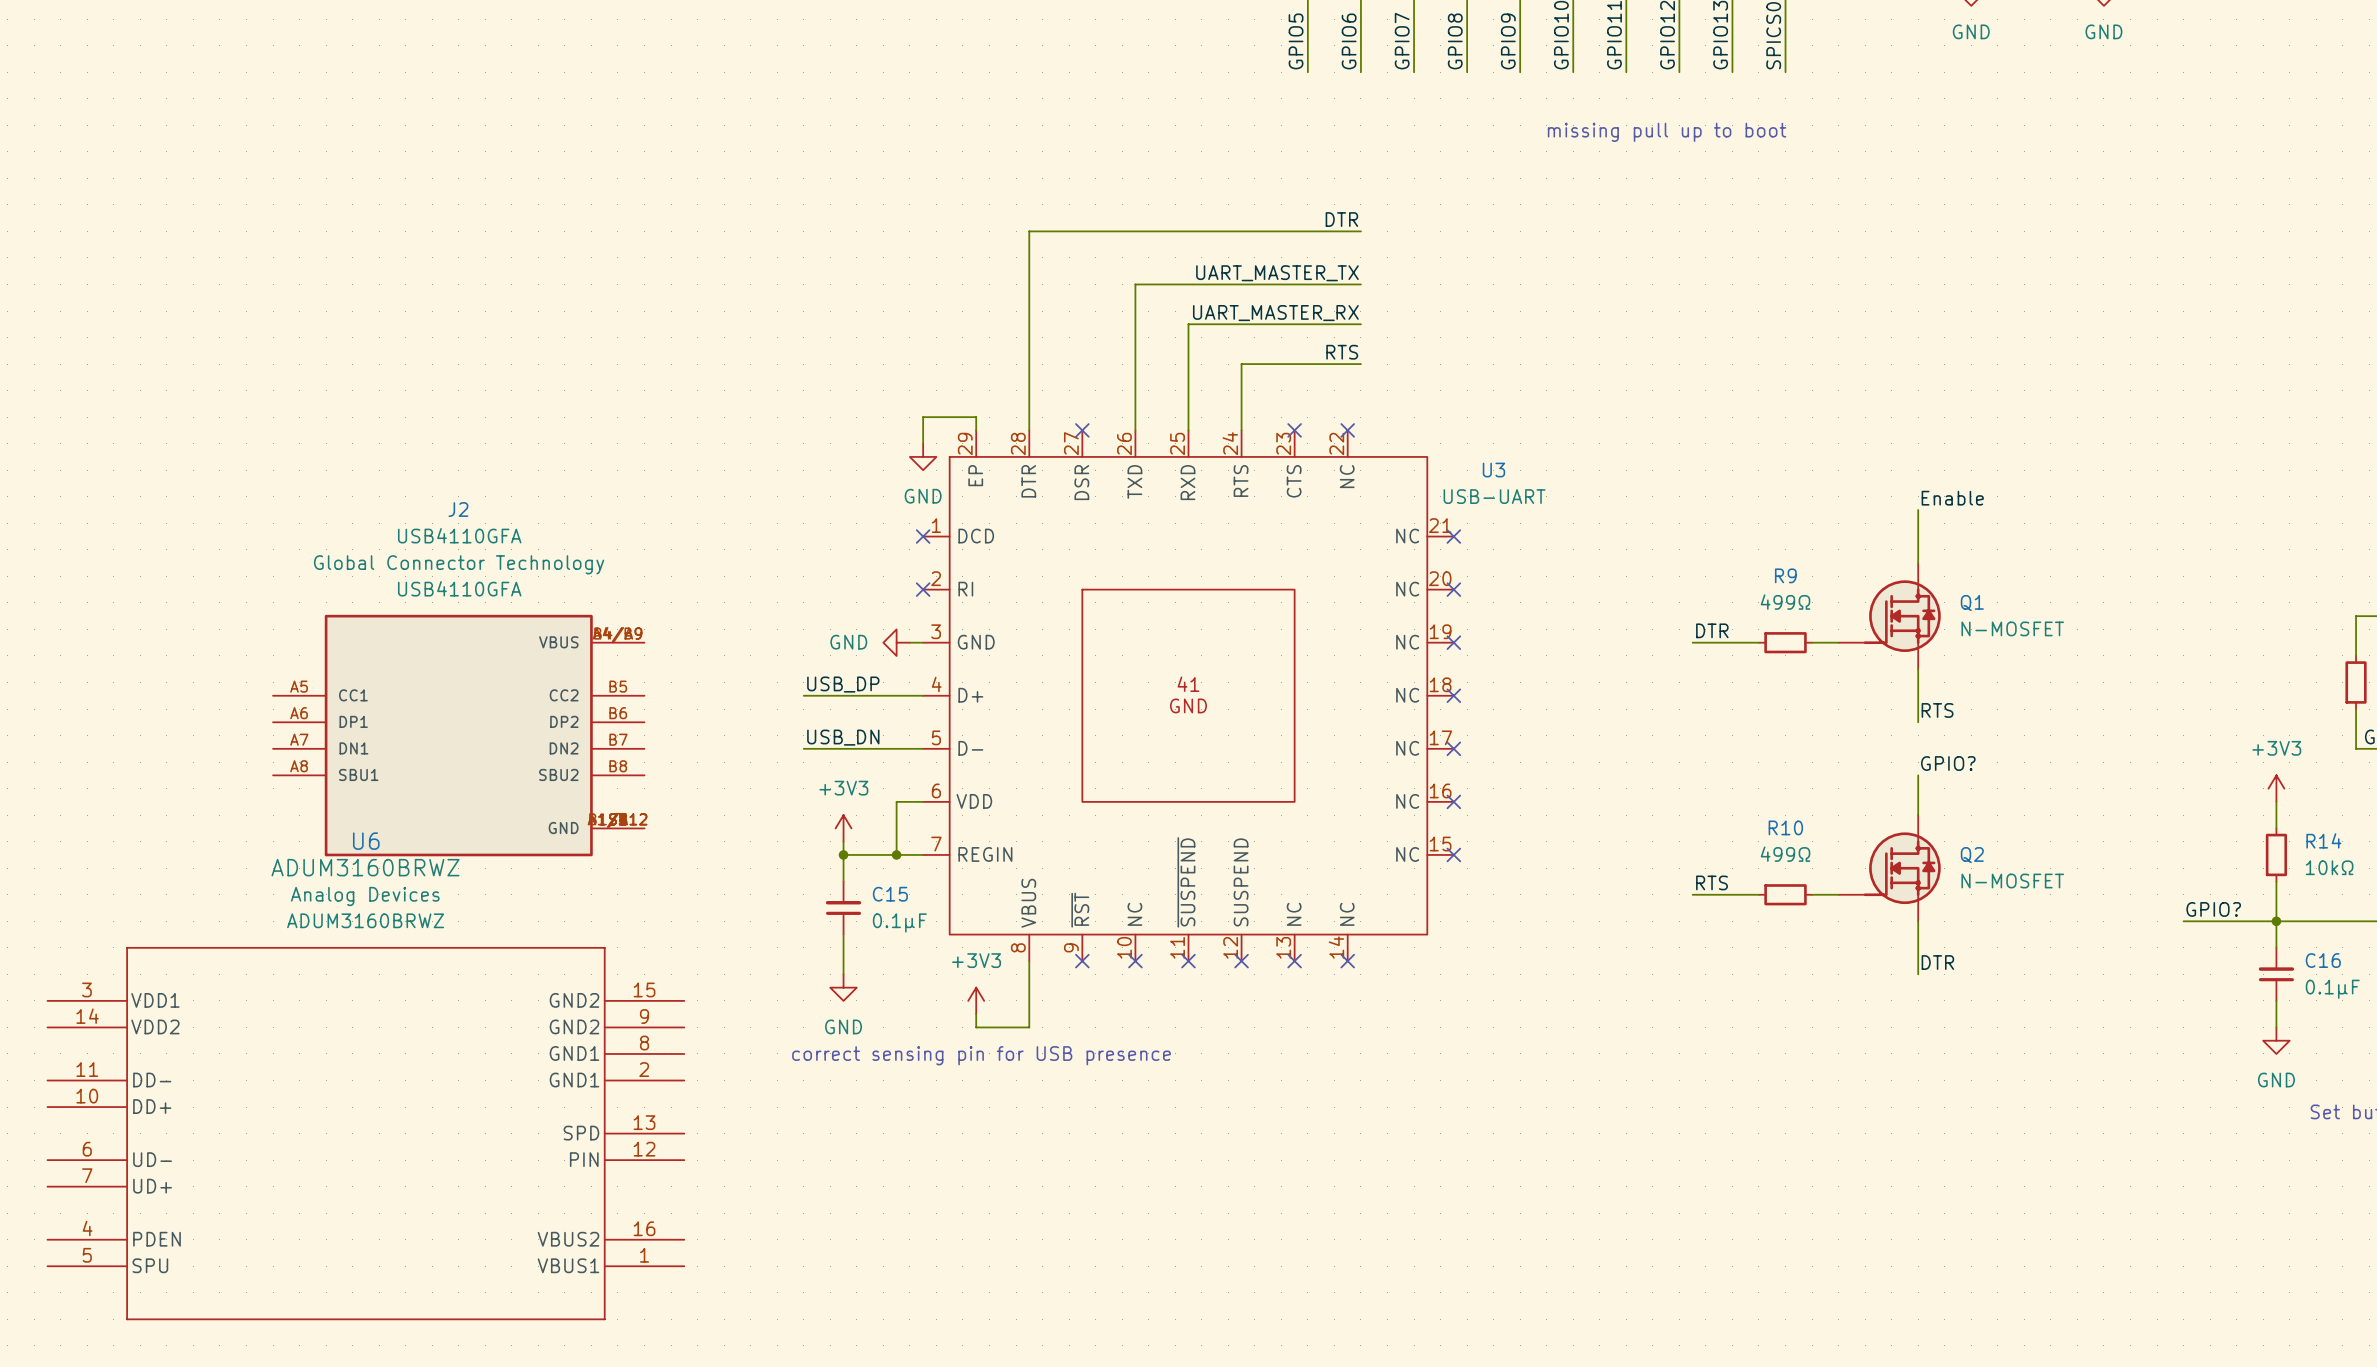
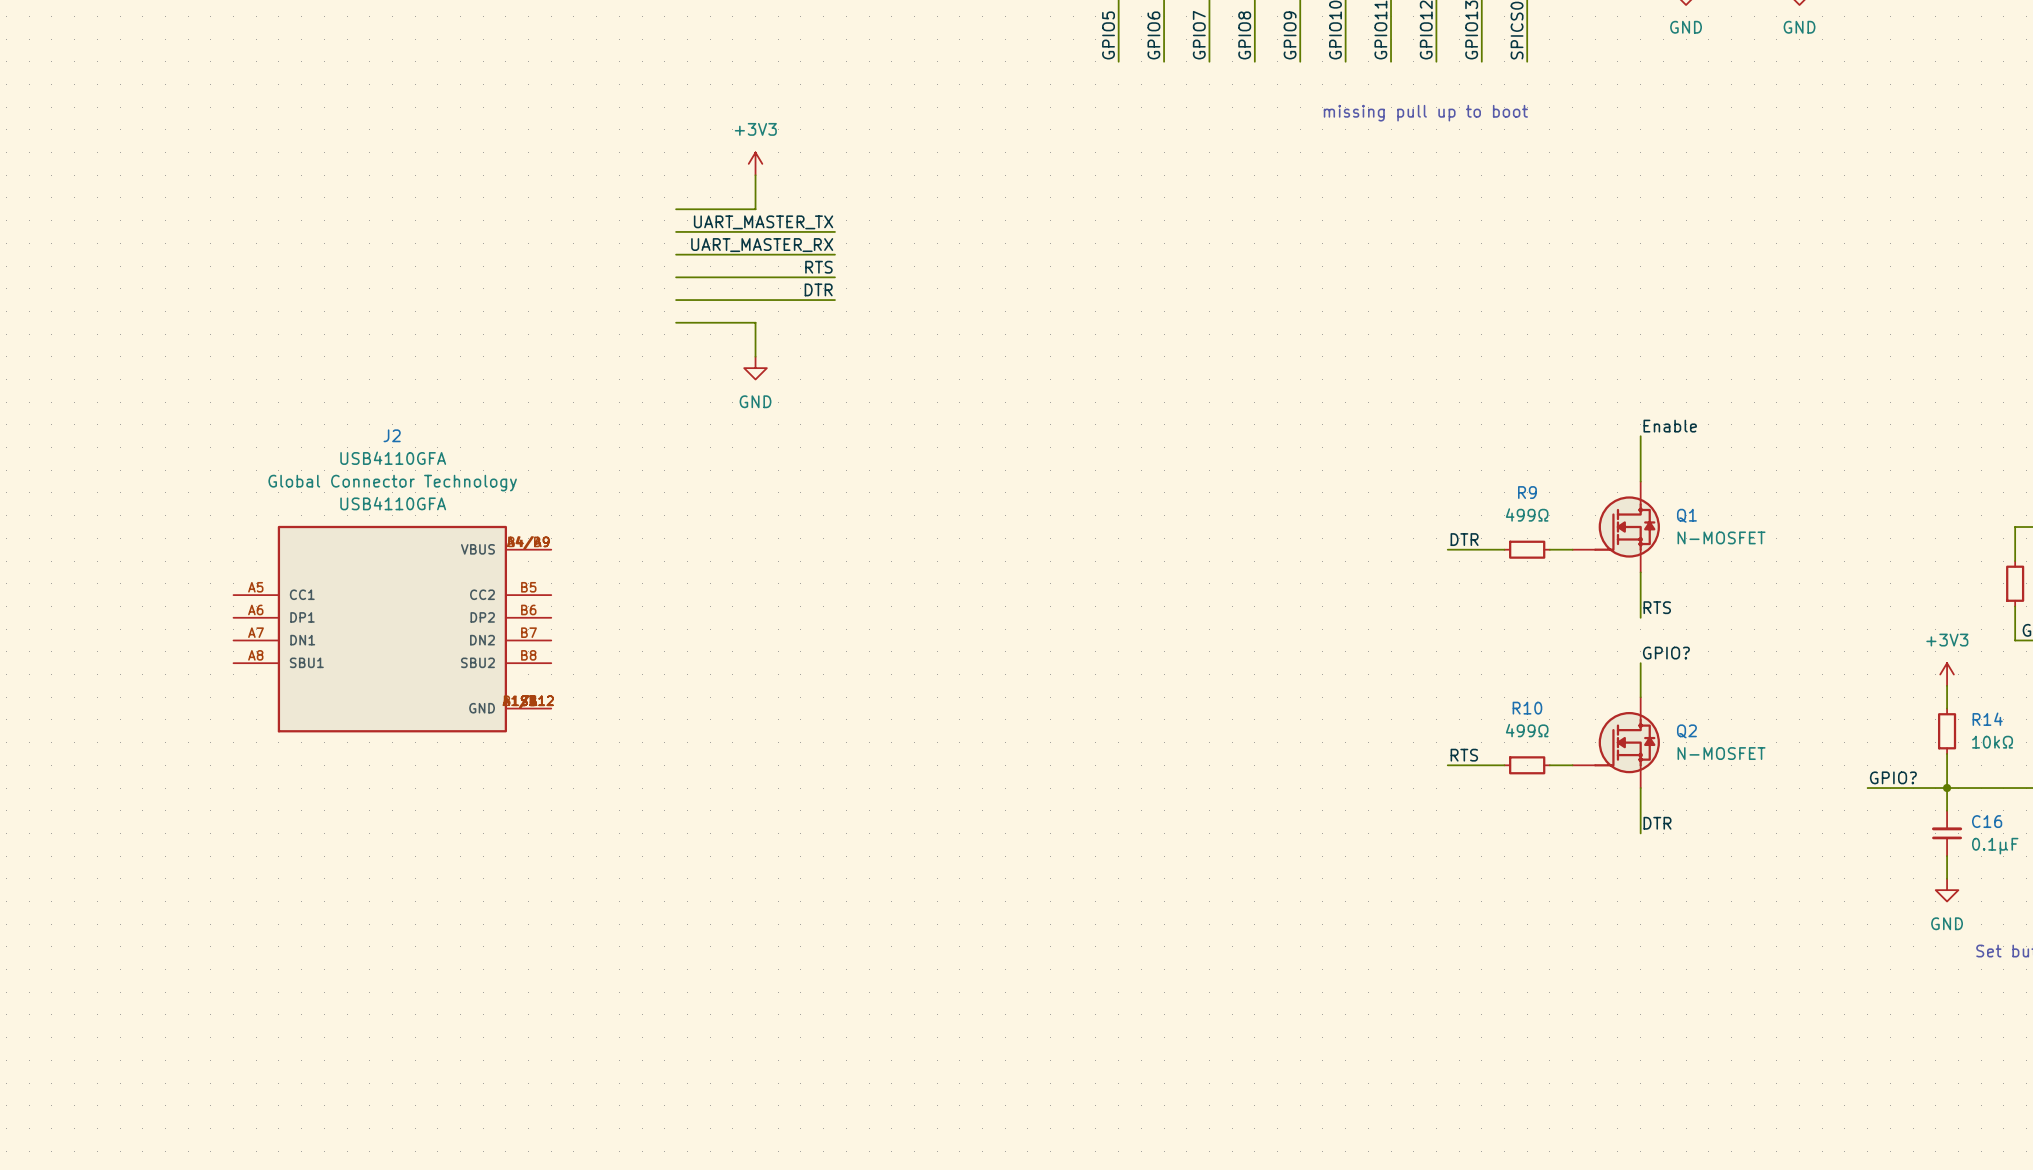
power symbol: none -> +3V3 (755, 163)
wire: none -> (755, 175) (755, 209) (676, 209)
label: DTR (1341, 219) -> none
wire: (1360, 231) (1029, 231) (1029, 430) -> none
label: none -> UART_MASTER_TX (763, 222)
wire: none -> (676, 231) (834, 231)
label: UART_MASTER_TX (1277, 273) -> none
wire: (1360, 284) (1135, 284) (1135, 430) -> none
label: none -> UART_MASTER_RX (762, 245)
wire: none -> (676, 254) (834, 254)
label: none -> RTS (818, 267)
label: UART_MASTER_RX (1275, 313) -> none
wire: none -> (676, 277) (834, 277)
wire: (1360, 324) (1188, 324) (1188, 430) -> none
label: none -> DTR (818, 289)
wire: none -> (676, 300) (834, 300)
label: RTS (1342, 352) -> none
wire: (1360, 364) (1241, 364) (1241, 430) -> none
wire: none -> (676, 322) (755, 322) (755, 356)
wire: (976, 430) (976, 417) (923, 417) (923, 443) -> none
no-connect mark: (1082, 430) -> none
no-connect mark: (1294, 430) -> none
no-connect mark: (1347, 430) -> none
power symbol position: GND (923, 456) -> GND (755, 368)
no-connect mark: (923, 536) -> none
no-connect mark: (1453, 536) -> none
no-connect mark: (923, 589) -> none
no-connect mark: (1453, 589) -> none
power symbol: GND (896, 642) -> none
wire: (909, 642) (923, 642) -> none
no-connect mark: (1453, 642) -> none
label: USB_DP (843, 684) -> none
wire: (803, 695) (923, 695) -> none
U3: (1188, 695) -> none
no-connect mark: (1453, 695) -> none
label: USB_DN (843, 737) -> none
wire: (803, 748) (923, 748) -> none
no-connect mark: (1453, 748) -> none
wire: (923, 801) (896, 801) (896, 854) -> none
no-connect mark: (1453, 801) -> none
power symbol: +3V3 (843, 828) -> none
wire: (843, 841) (843, 881) -> none
wire: (843, 854) (923, 854) -> none
junction: (843, 854) -> none
junction: (896, 854) -> none
no-connect mark: (1453, 854) -> none
C15: (843, 908) -> none
wire: (843, 934) (843, 974) -> none
wire: (1029, 961) (1029, 1027) (976, 1027) (976, 1014) -> none
no-connect mark: (1082, 961) -> none
no-connect mark: (1135, 961) -> none
no-connect mark: (1188, 961) -> none
no-connect mark: (1241, 961) -> none
no-connect mark: (1294, 961) -> none
no-connect mark: (1347, 961) -> none
power symbol: GND (843, 987) -> none
power symbol: +3V3 (976, 1000) -> none
text: correct sensing pin for USB presence (981, 1055) -> none
U6: ADUM3160BRWZ (365, 1133) -> none

